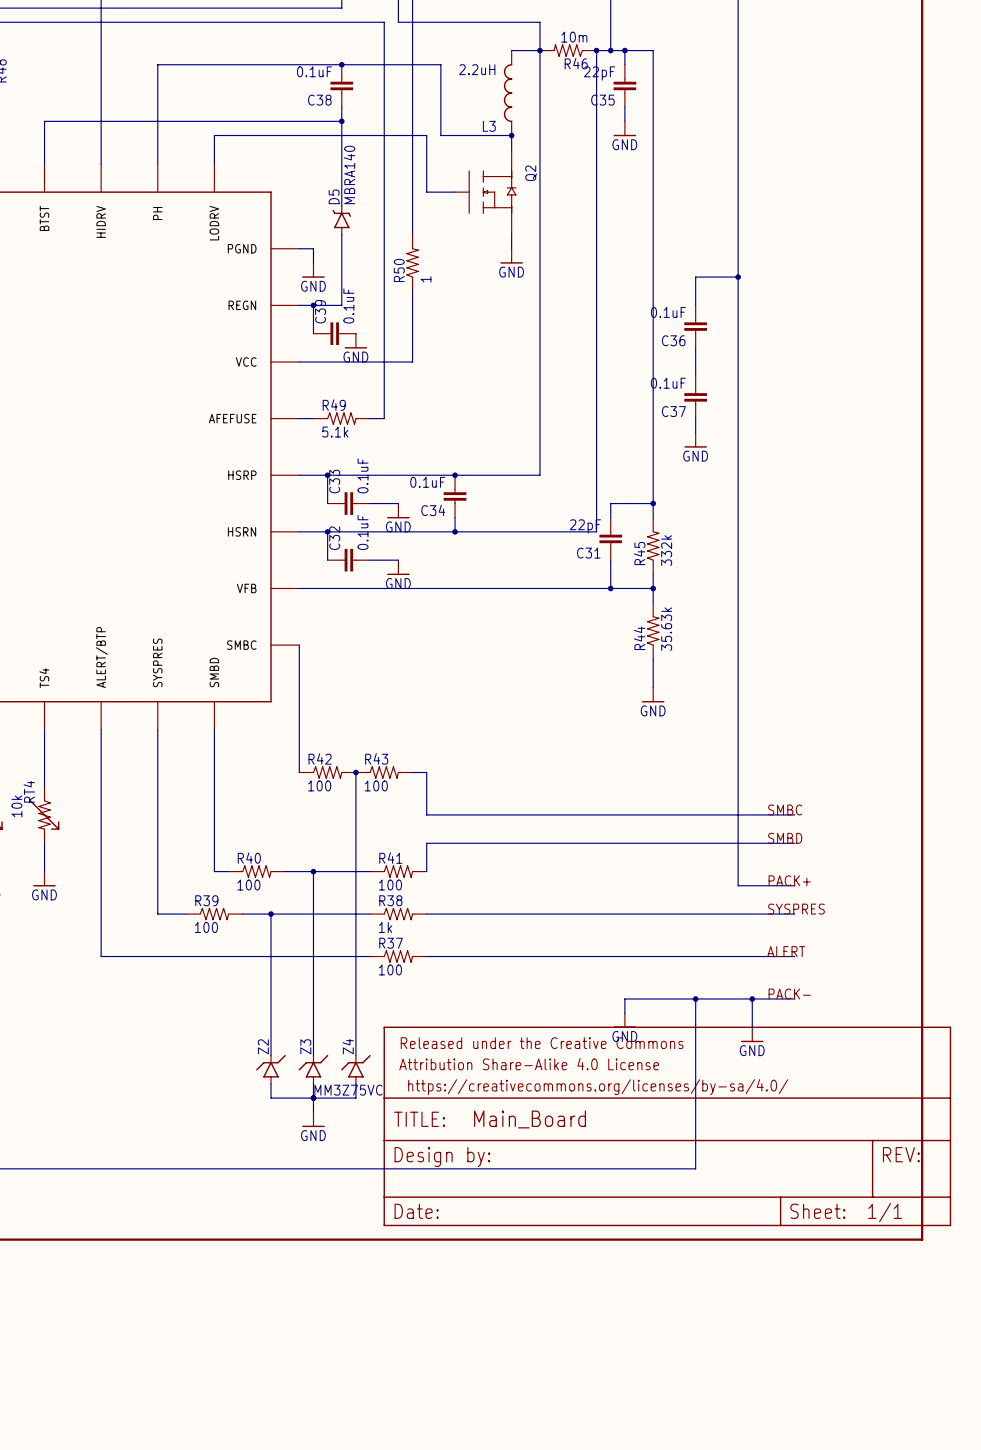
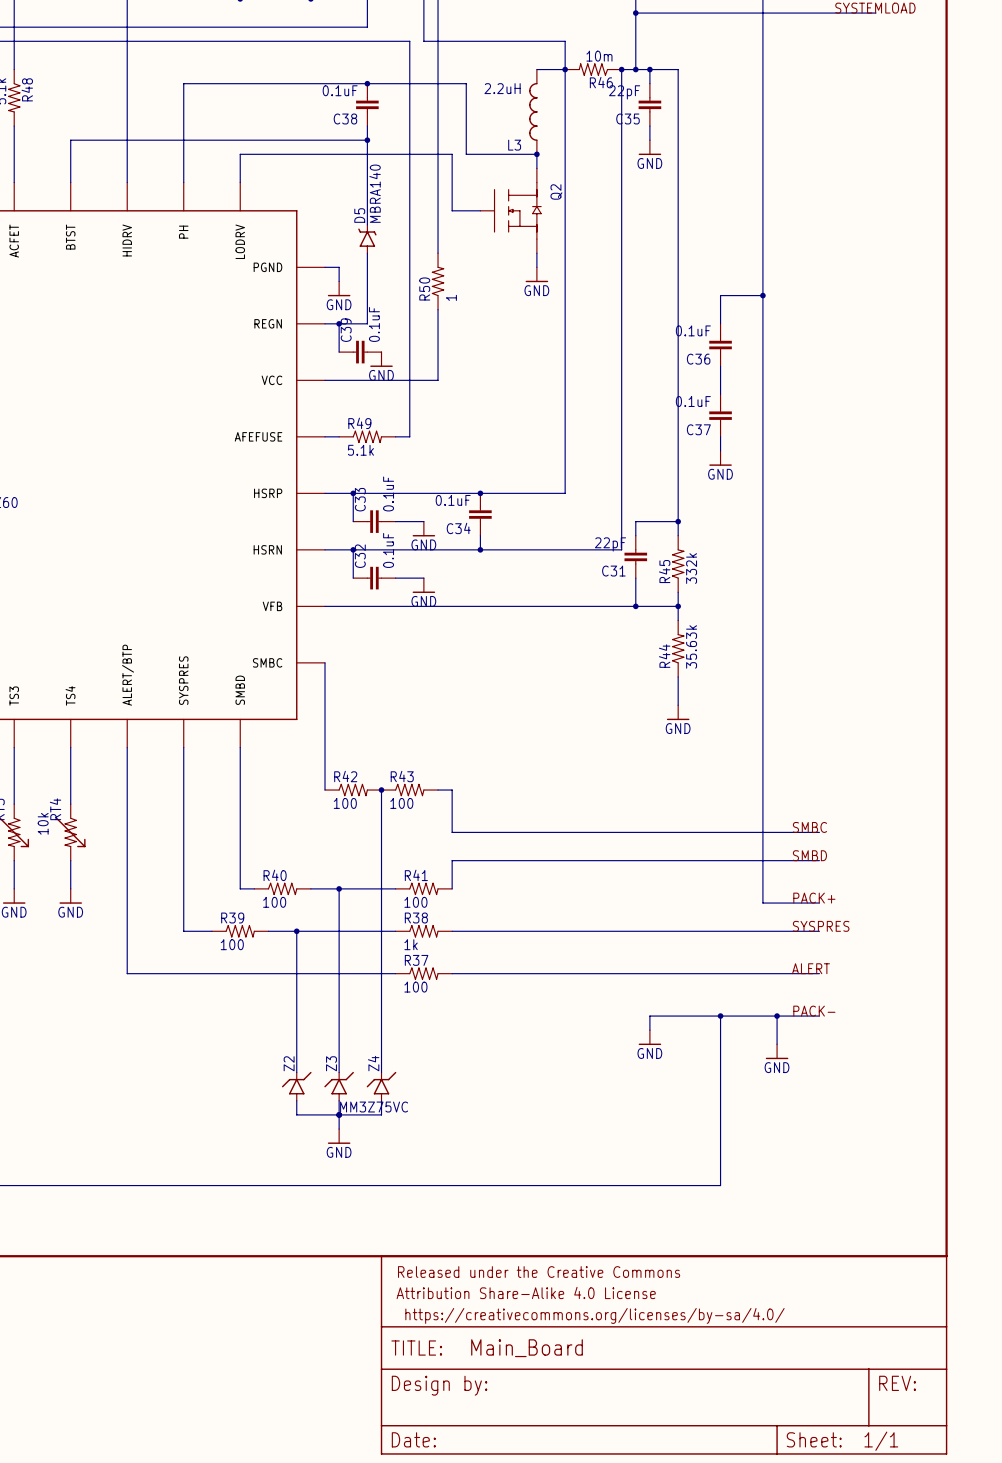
part: (667, 1126) -> none
part: none -> (664, 1355)

